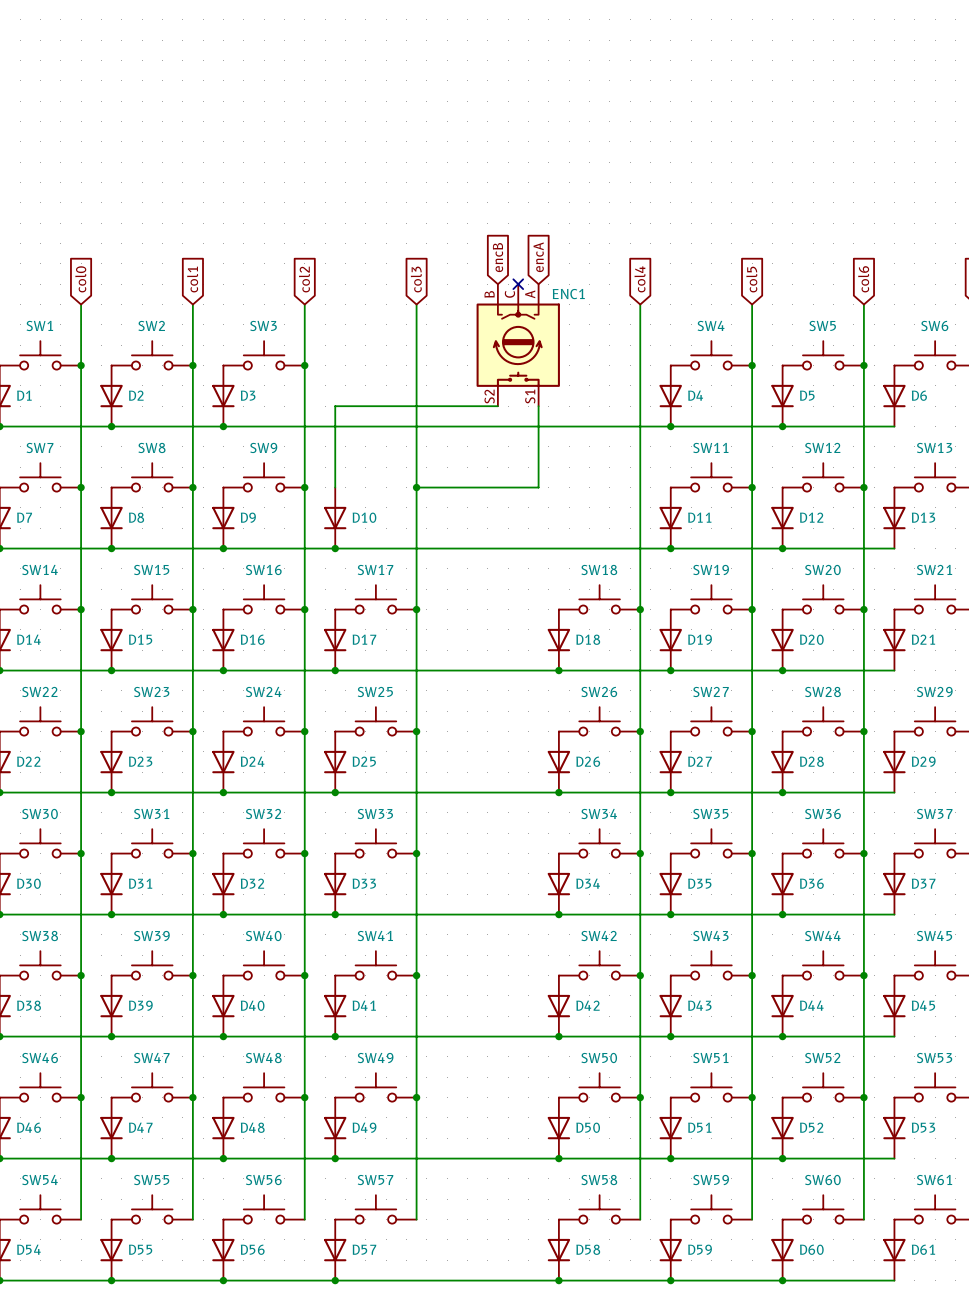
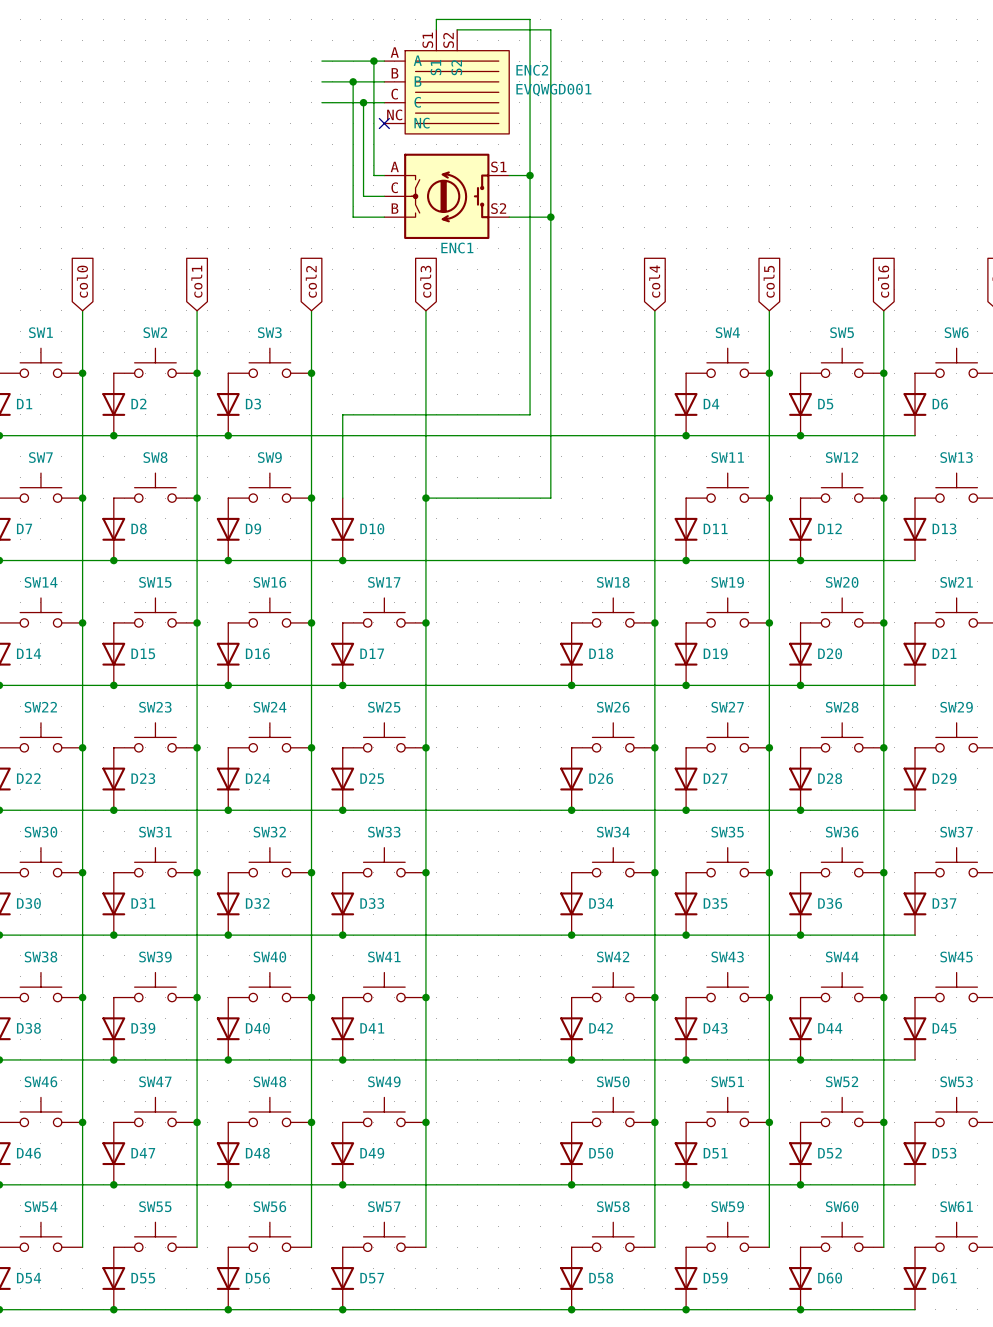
wire: none -> (436, 29) (436, 19) (530, 19) (530, 414) (509, 414)
wire: none -> (457, 29) (550, 29) (550, 414)
wire: none -> (321, 61) (384, 61)
wire: none -> (373, 61) (373, 175) (384, 175)
junction: none -> (373, 61)
wire: none -> (321, 81) (384, 81)
wire: none -> (353, 81) (353, 217) (384, 217)
junction: none -> (353, 81)
ENC2: none -> EVQWGD001 (446, 81)
wire: none -> (321, 102) (384, 102)
wire: none -> (363, 102) (363, 196) (384, 196)
junction: none -> (363, 102)
no-connect mark: none -> (384, 123)
wire: none -> (509, 175) (530, 175)
junction: none -> (530, 175)
wire: none -> (509, 217) (550, 217)
junction: none -> (550, 217)
global label: encB (498, 257) -> none
global label: encA (538, 257) -> none
no-connect mark: (518, 284) -> none
ENC1 name position: ENC1 (568, 294) -> ENC1 (457, 247)
ENC1 rotation: 0° (518, 345) -> 90° counterclockwise (446, 196)
ENC1 position: (518, 345) -> (446, 196)

